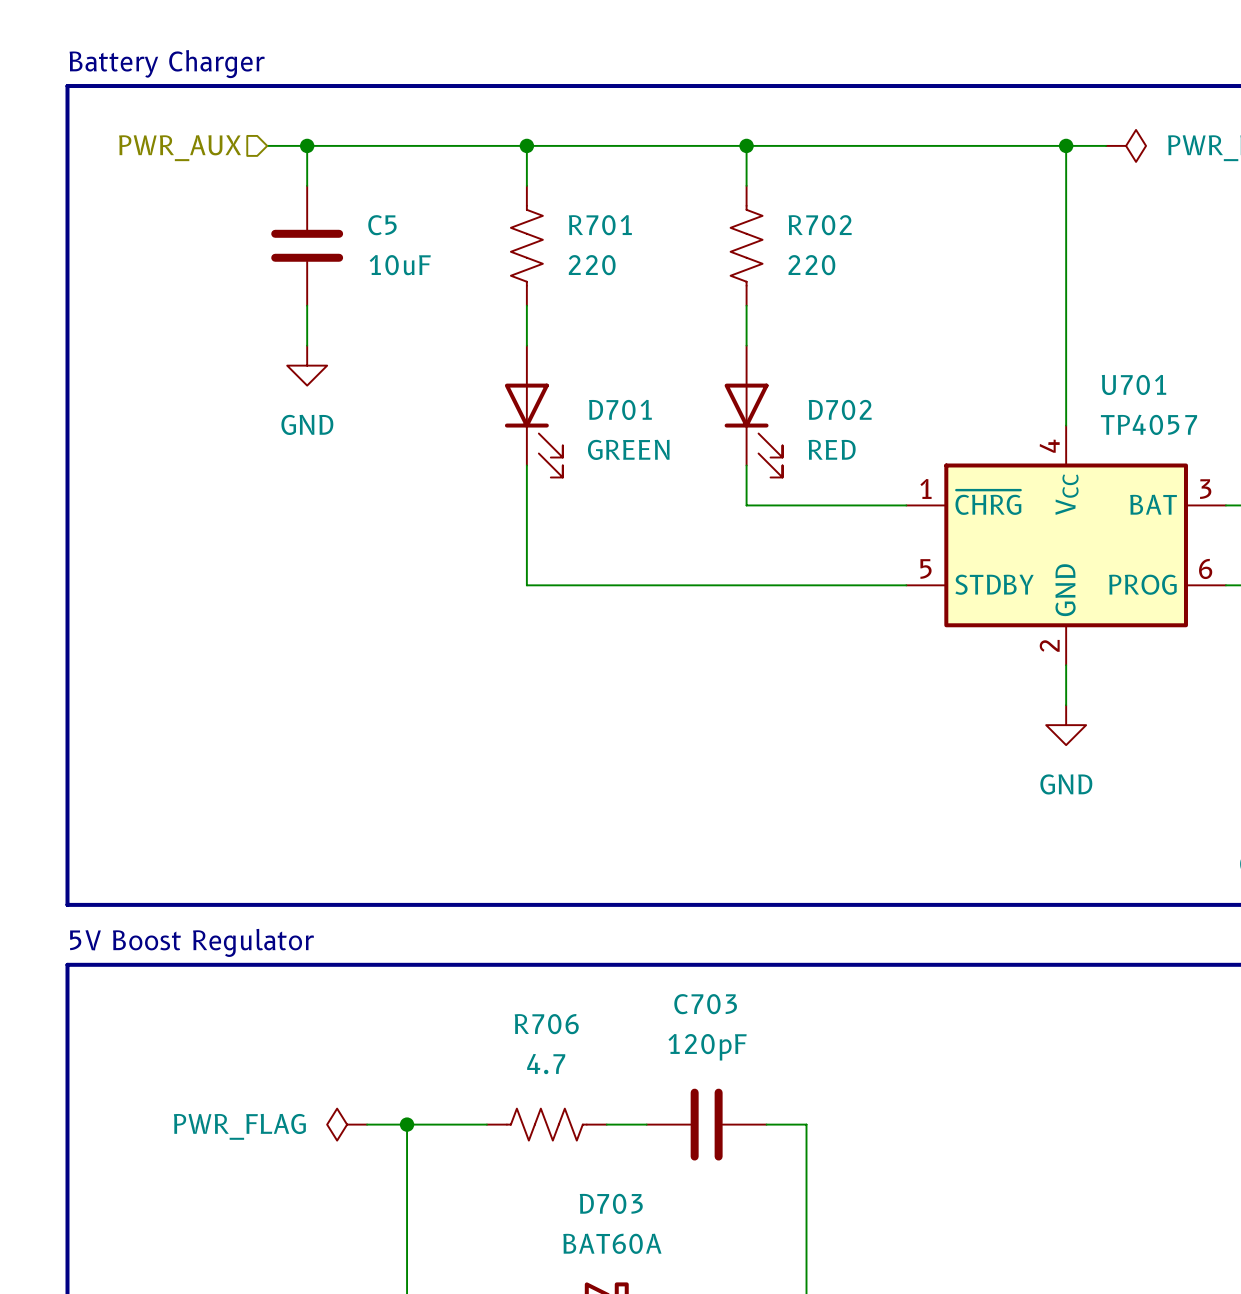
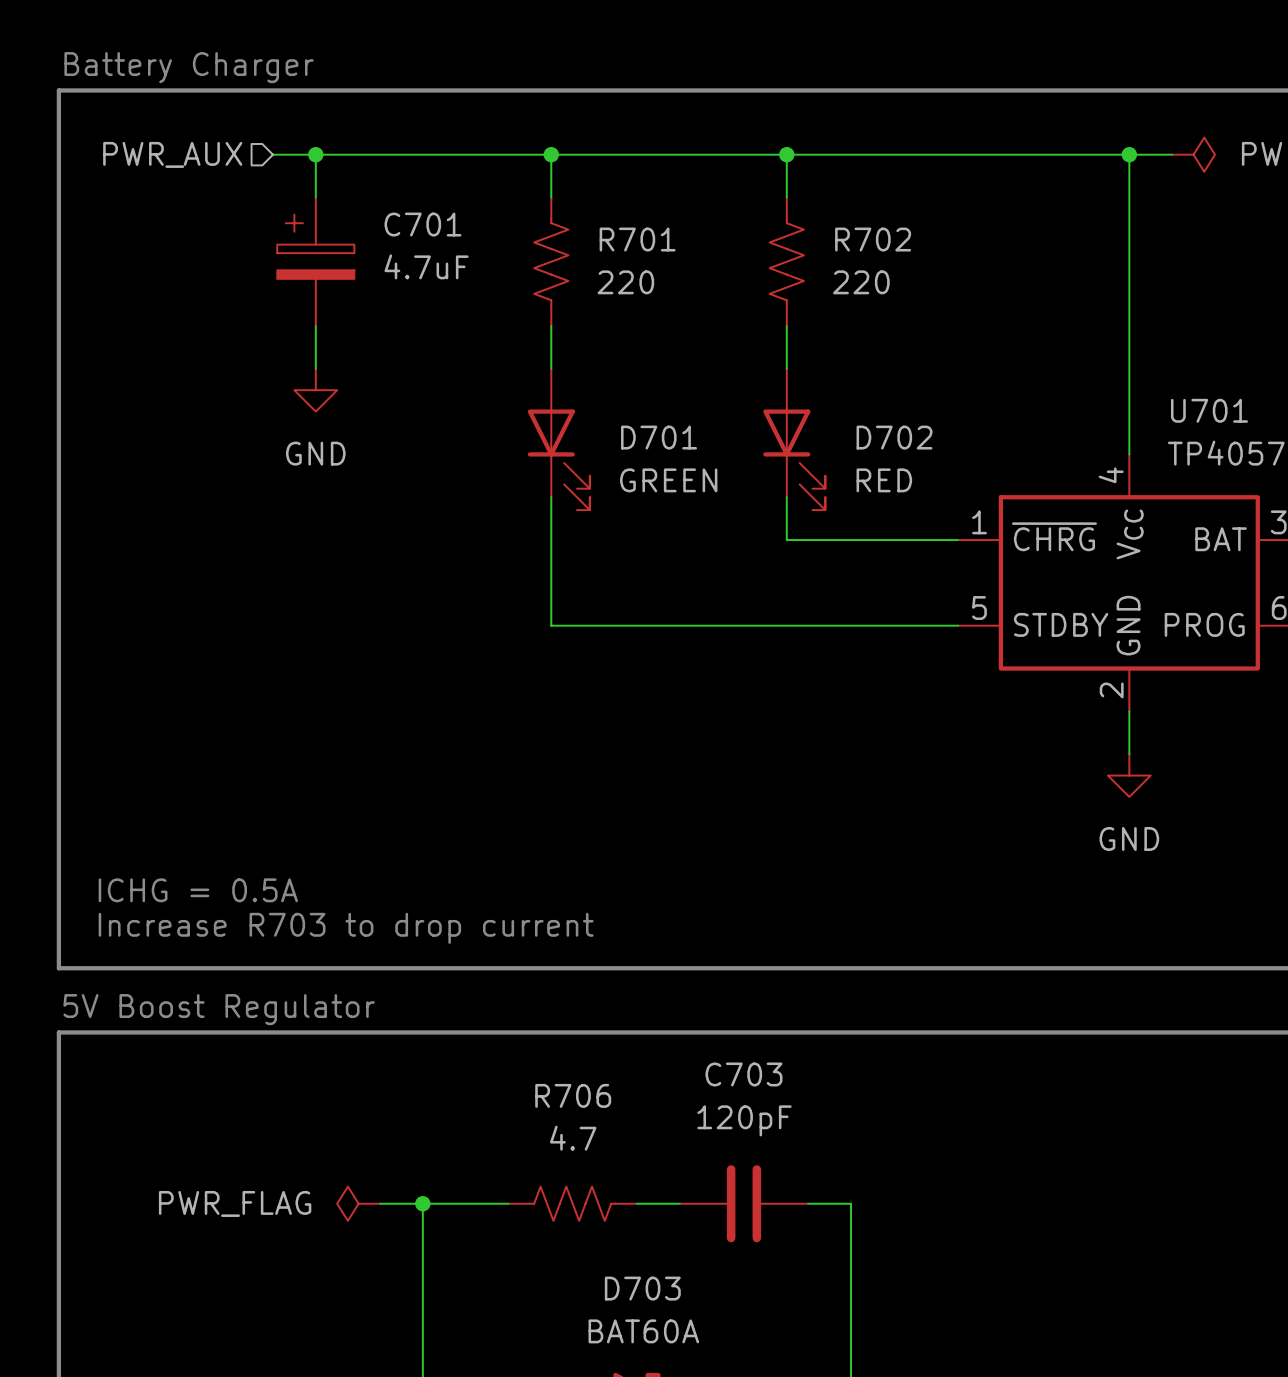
C5: 10uF (307, 245) -> none
C701: none -> 4.7uF (315, 261)
text: none -> ICHG = 0.5A (198, 890)
text: none -> Increase R703 to drop current (346, 928)

